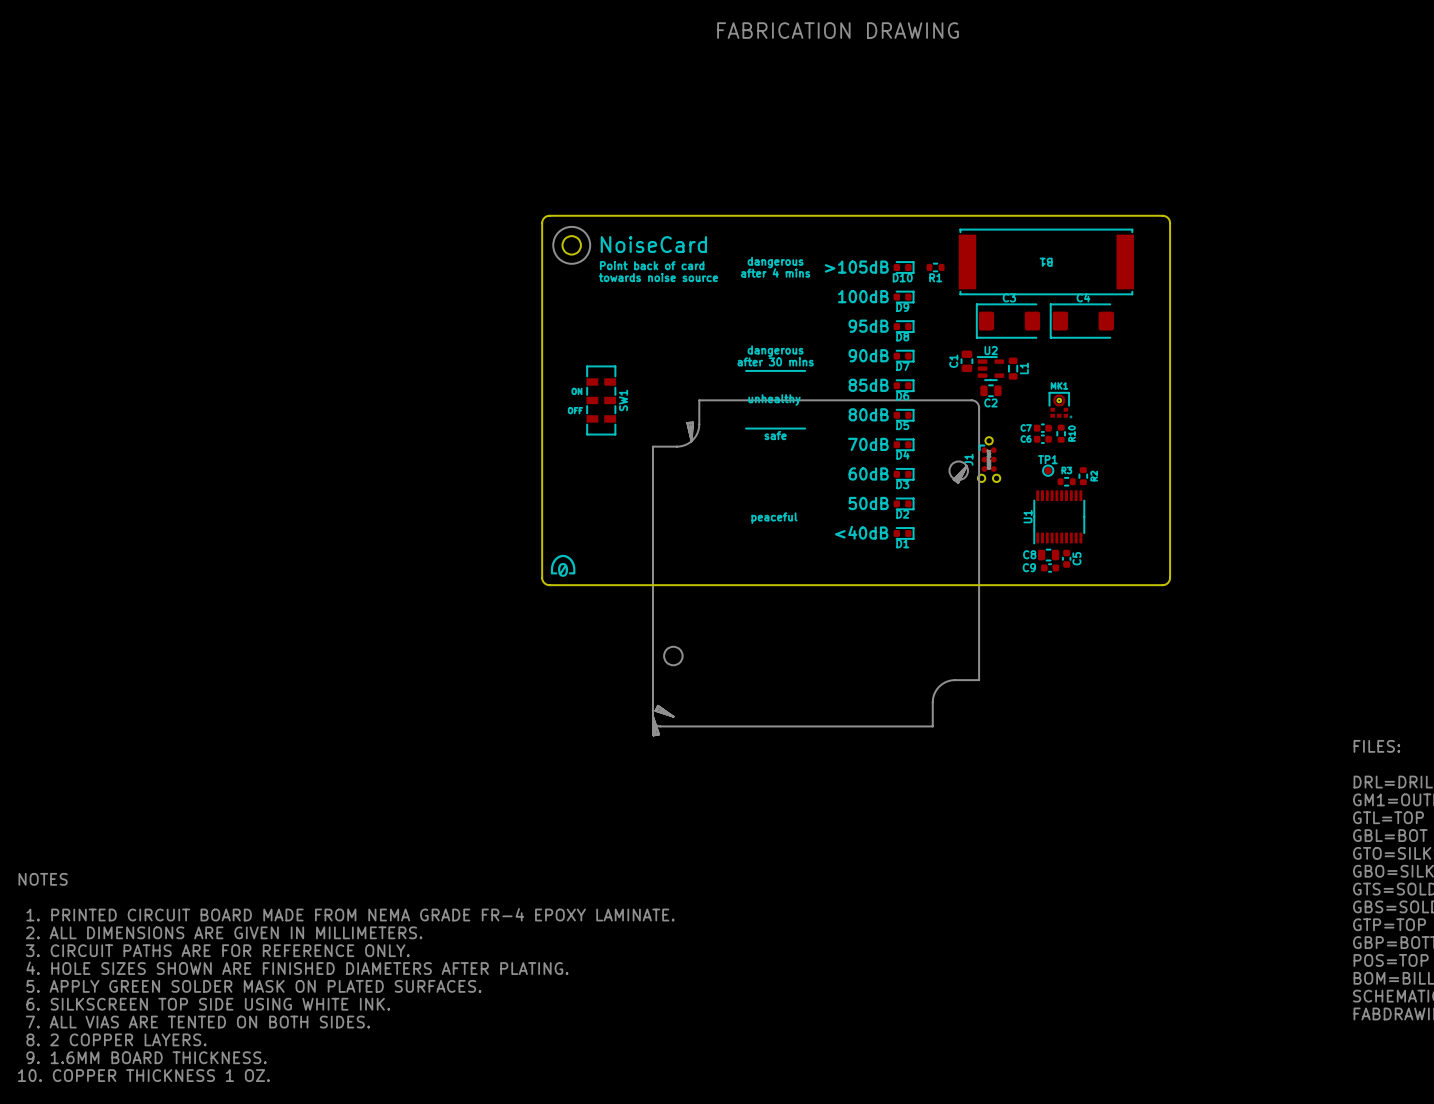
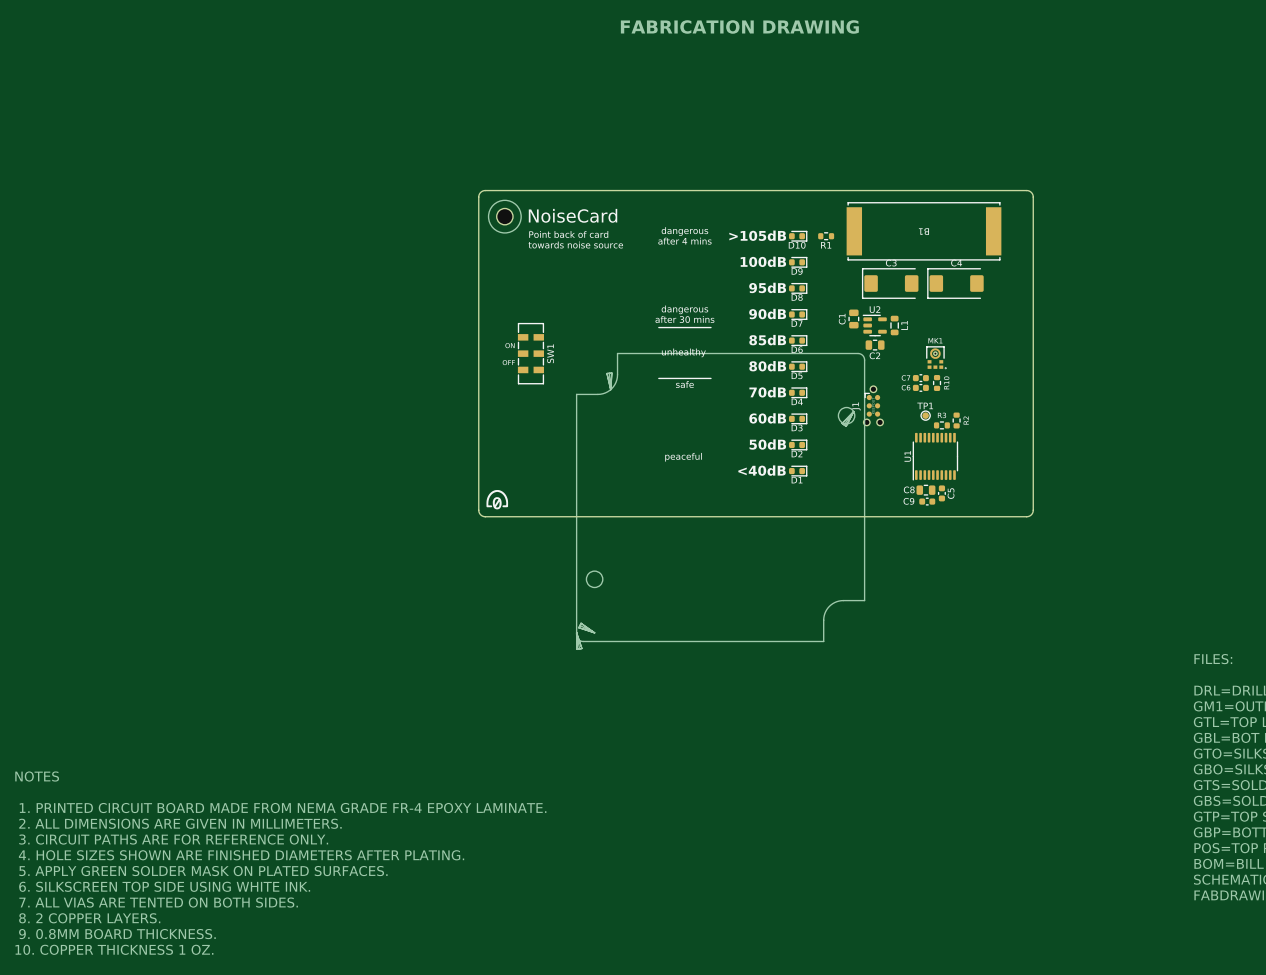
text: 9. 1.6MM BOARD THICKNESS. (146, 1057) -> 9. 0.8MM BOARD THICKNESS. (117, 934)

